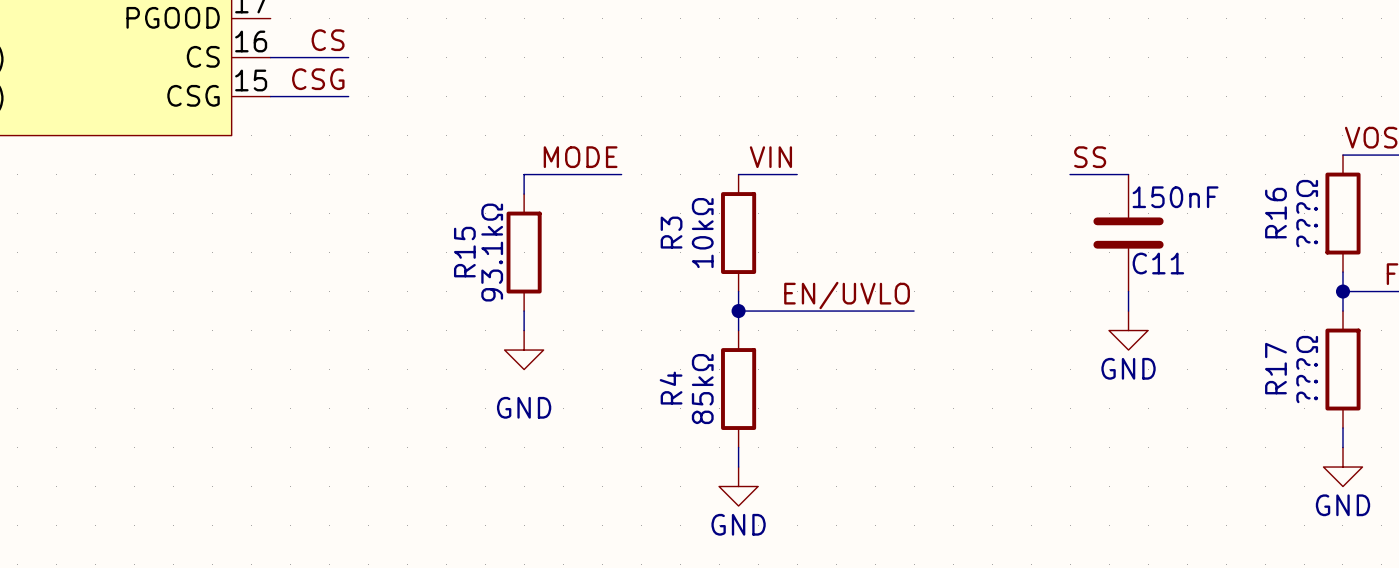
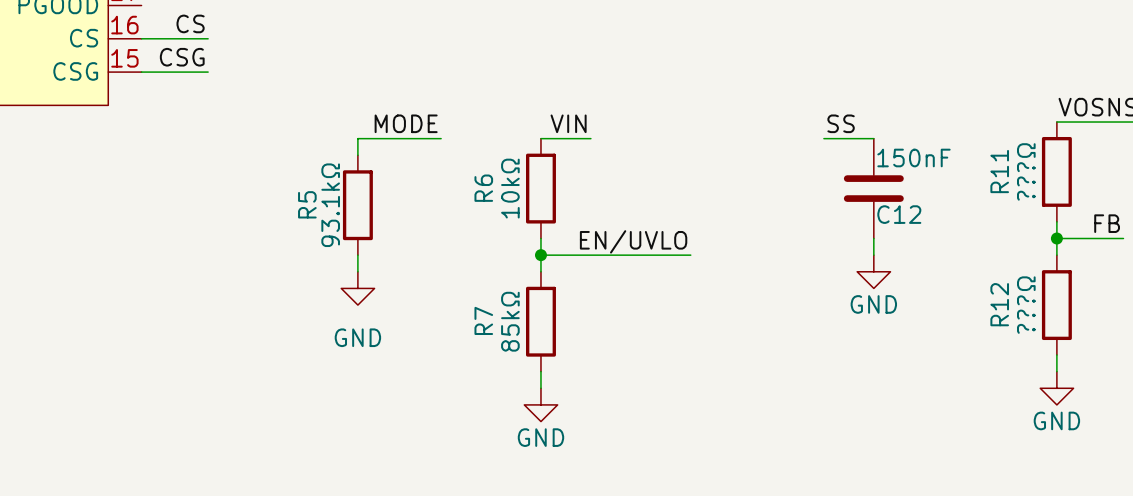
R16 name: R16 (1275, 213) -> R11 (999, 171)
R3 name: R3 (671, 232) -> R6 (483, 188)
R15 name: R15 (464, 252) -> R5 (307, 204)
C11 name: C11 (1158, 263) -> C12 (899, 214)
R17 name: R17 (1275, 368) -> R12 (999, 304)
R4 name: R4 (671, 388) -> R7 (483, 320)

